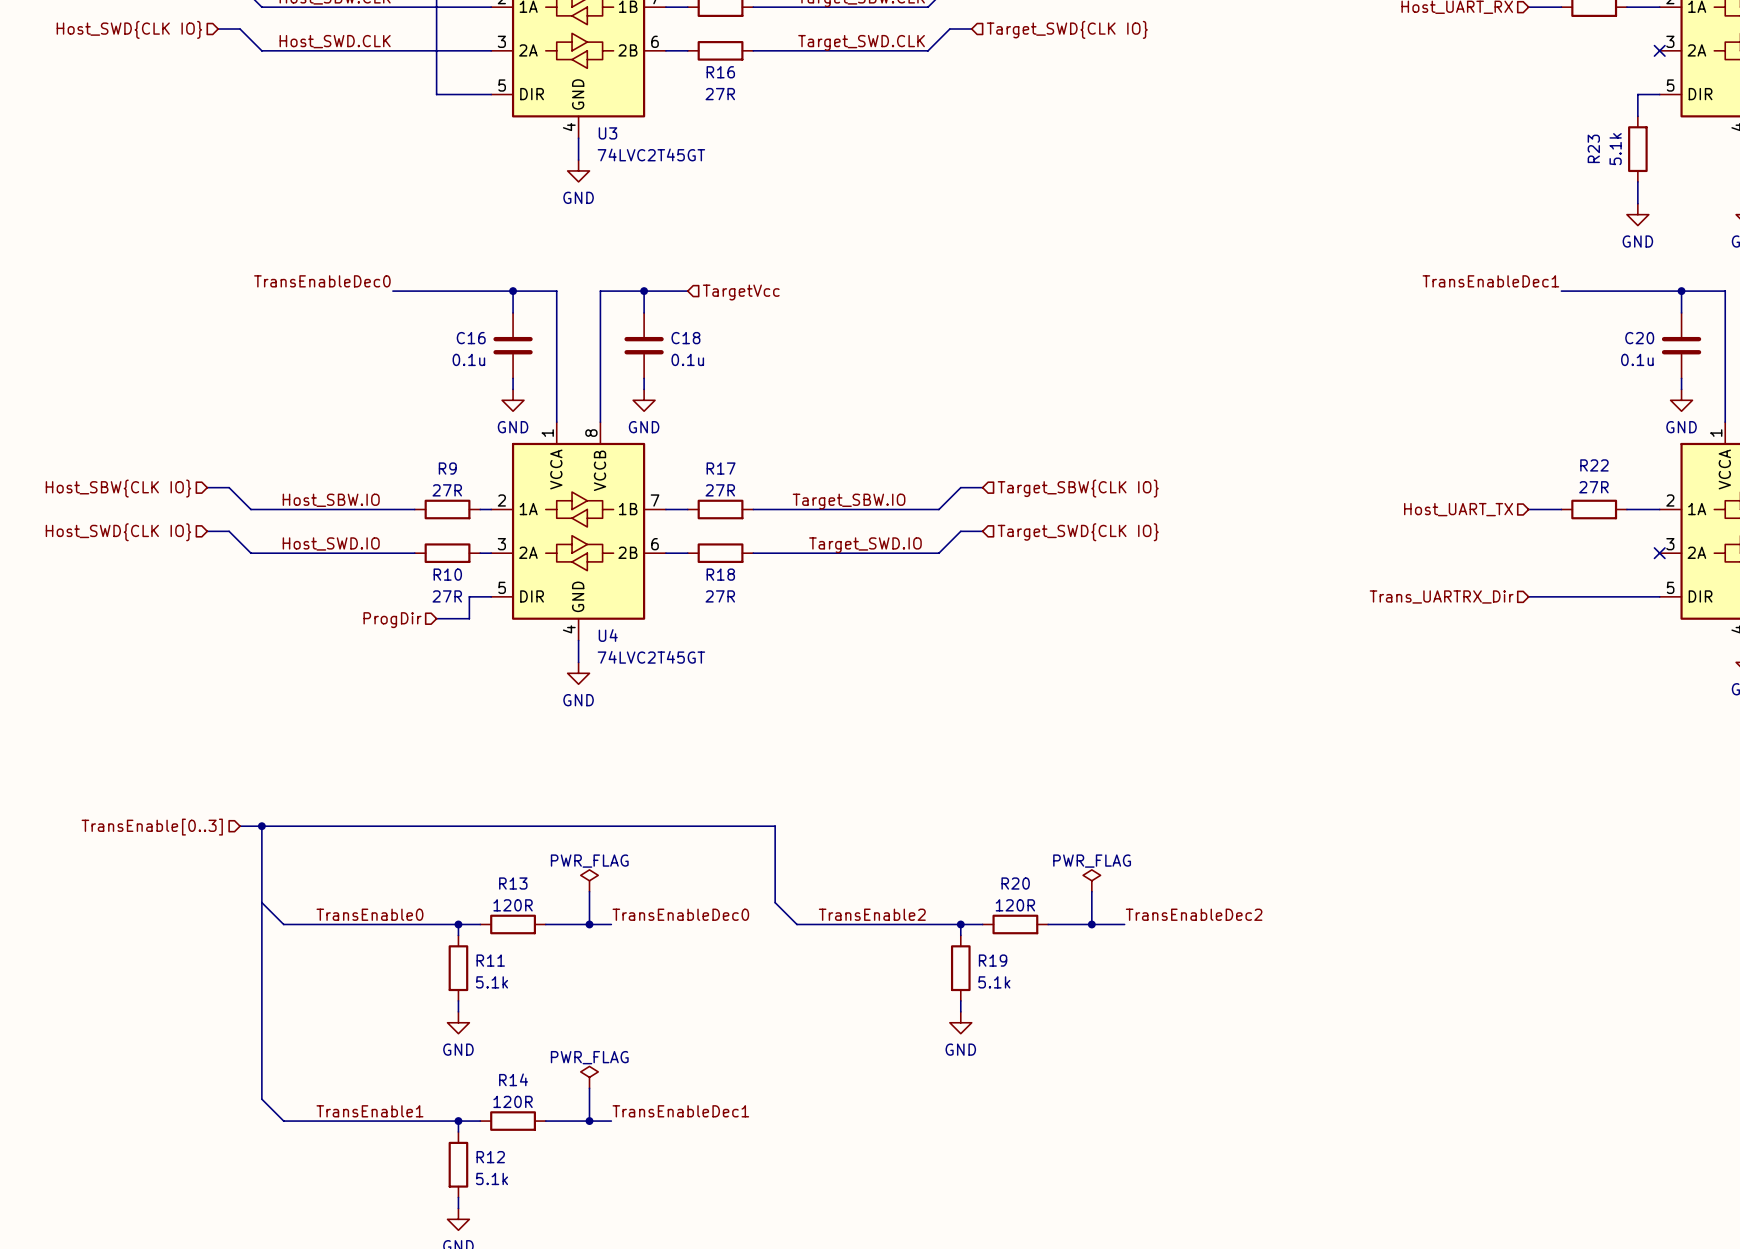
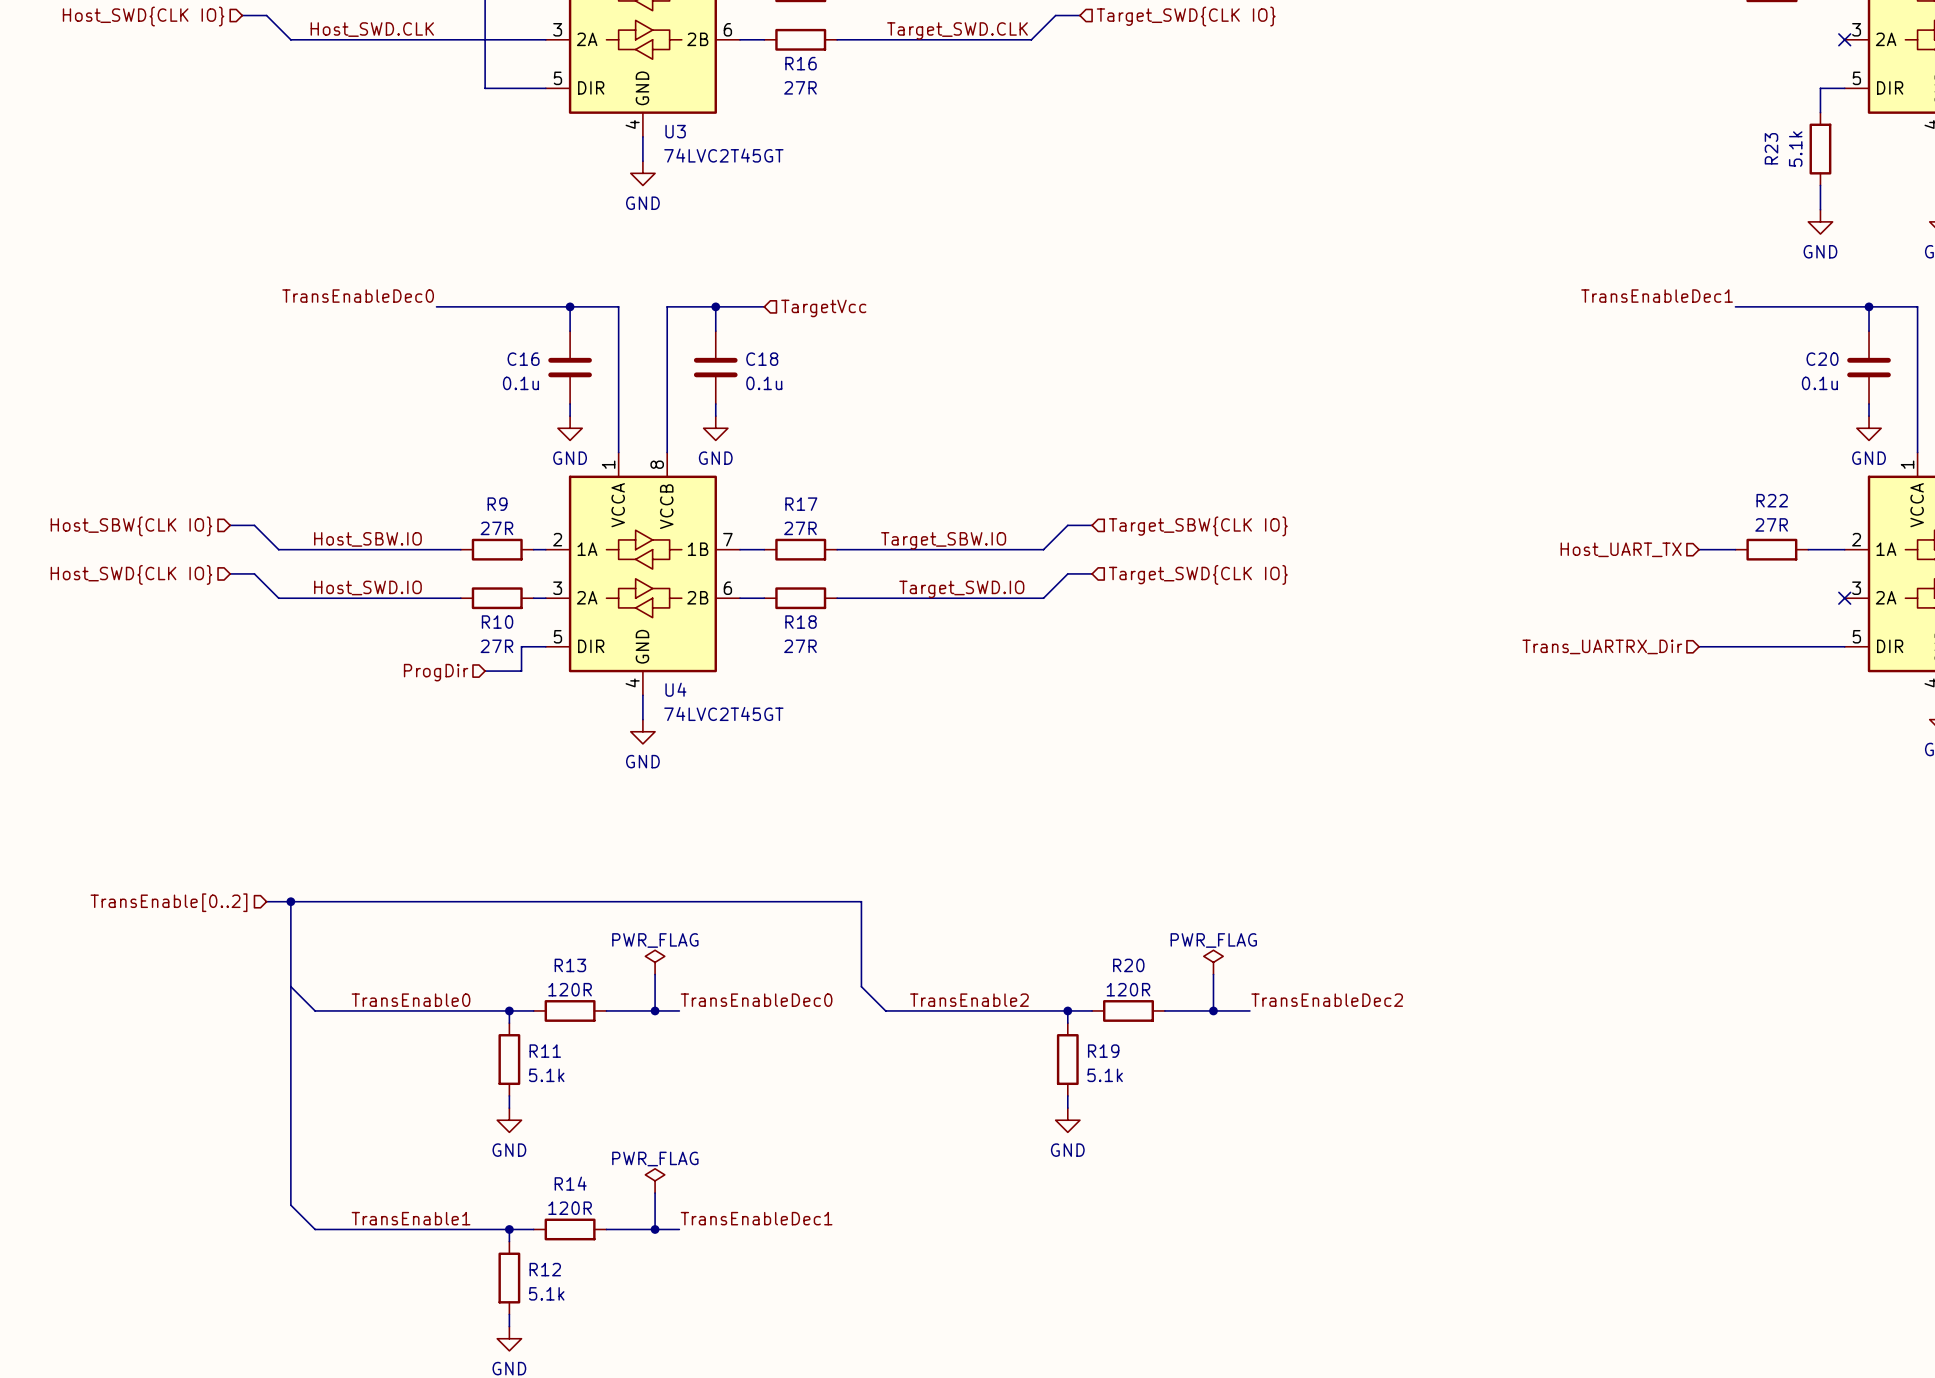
hierarchical label: TransEnable[0..3] (152, 827) -> TransEnable[0..2] (169, 902)

